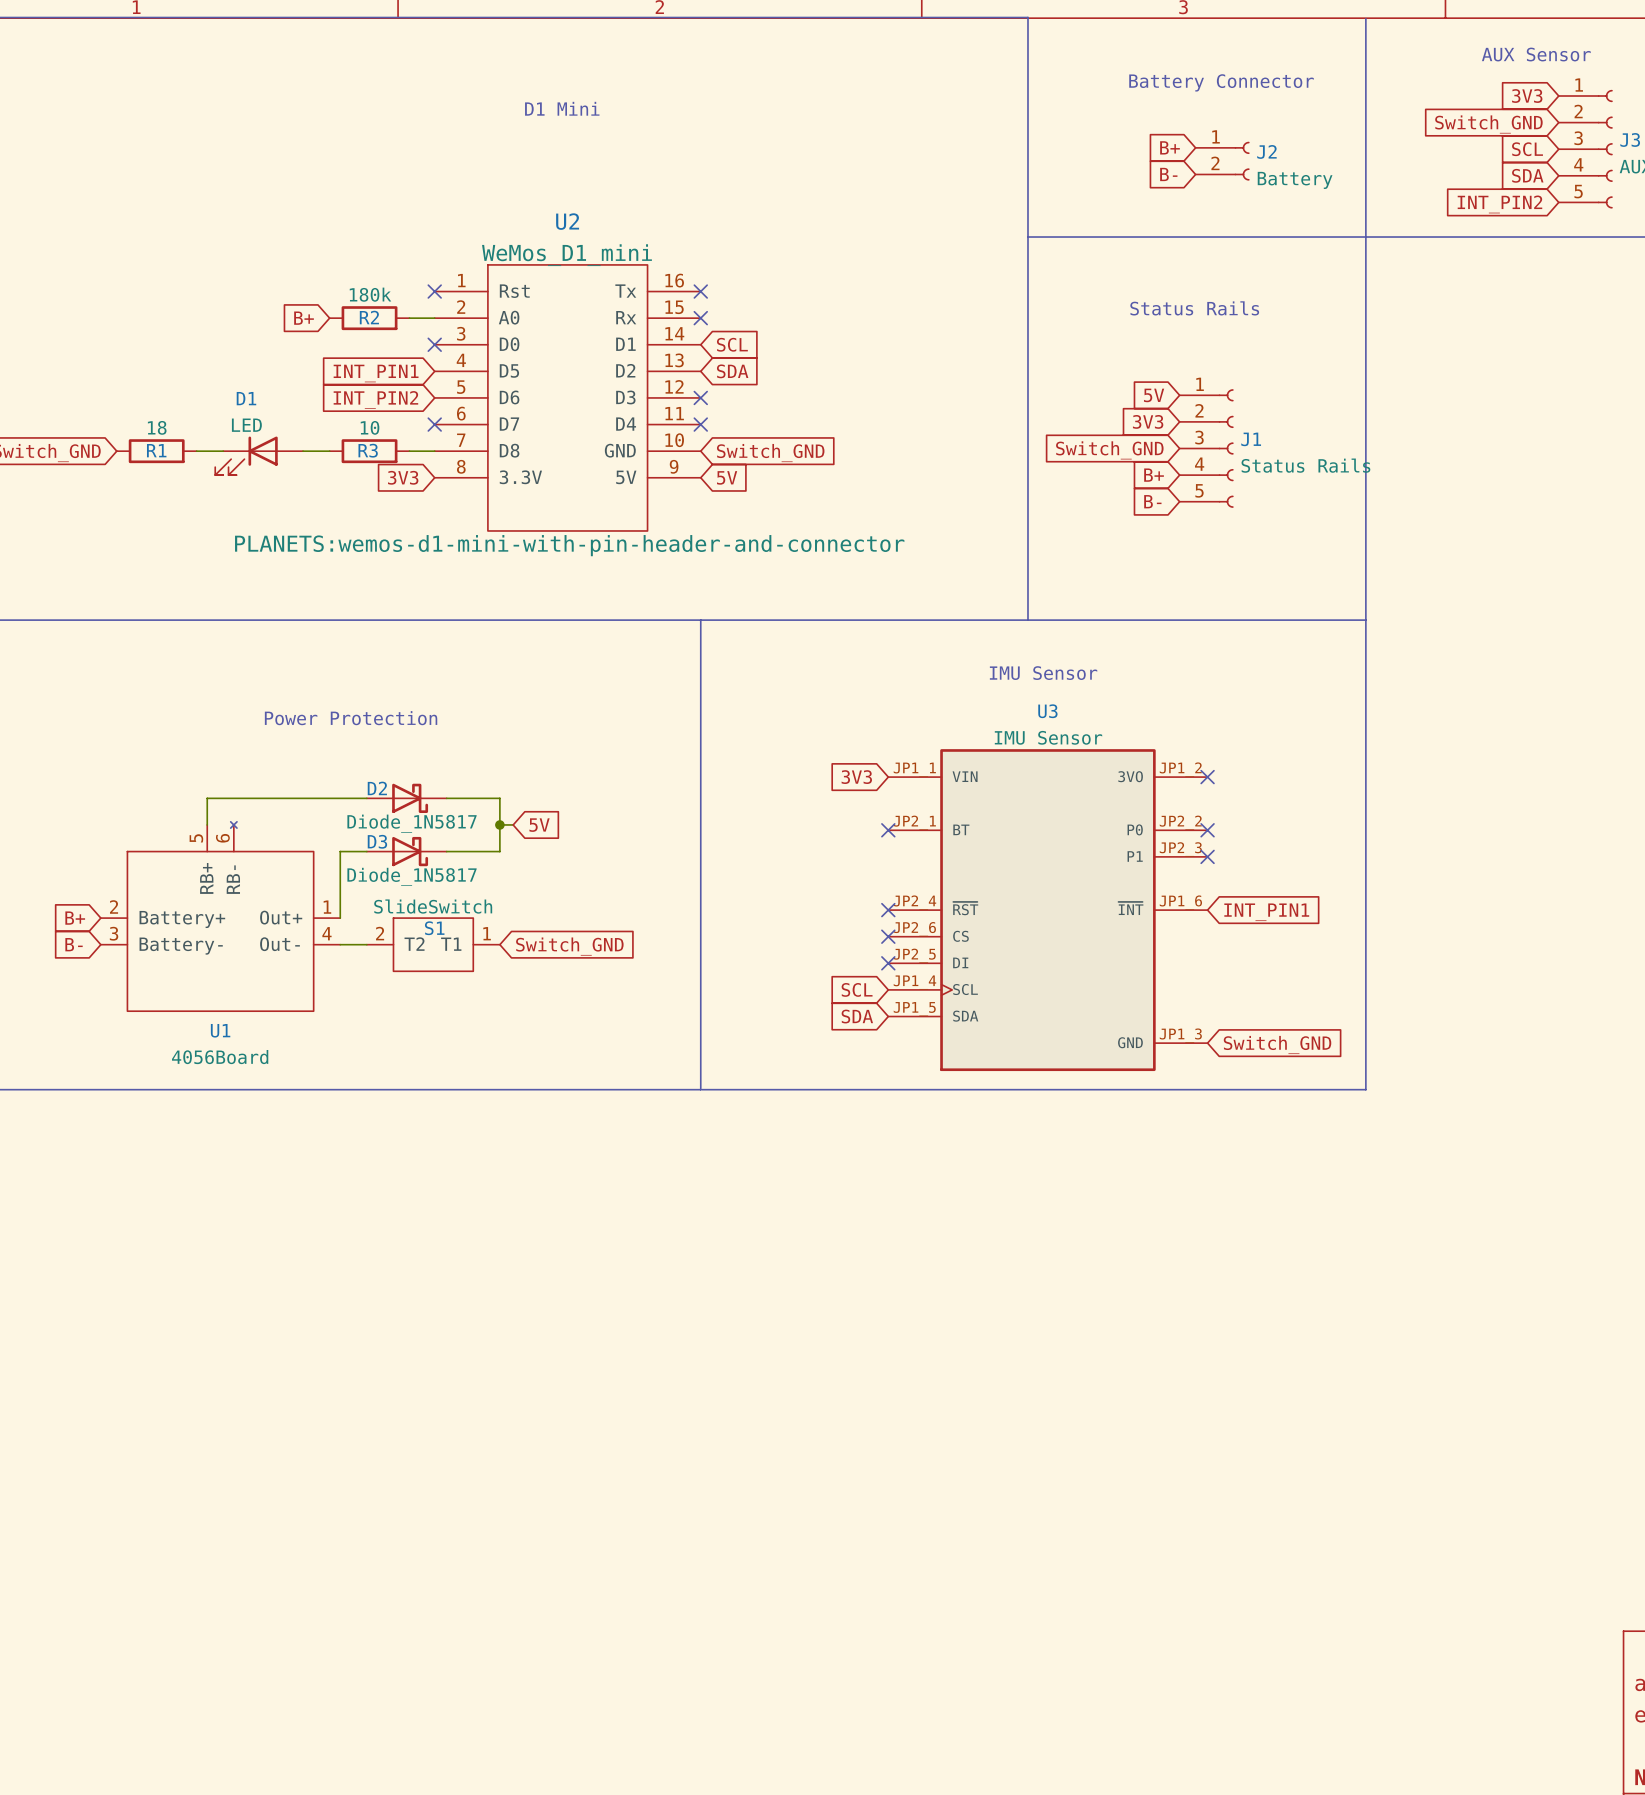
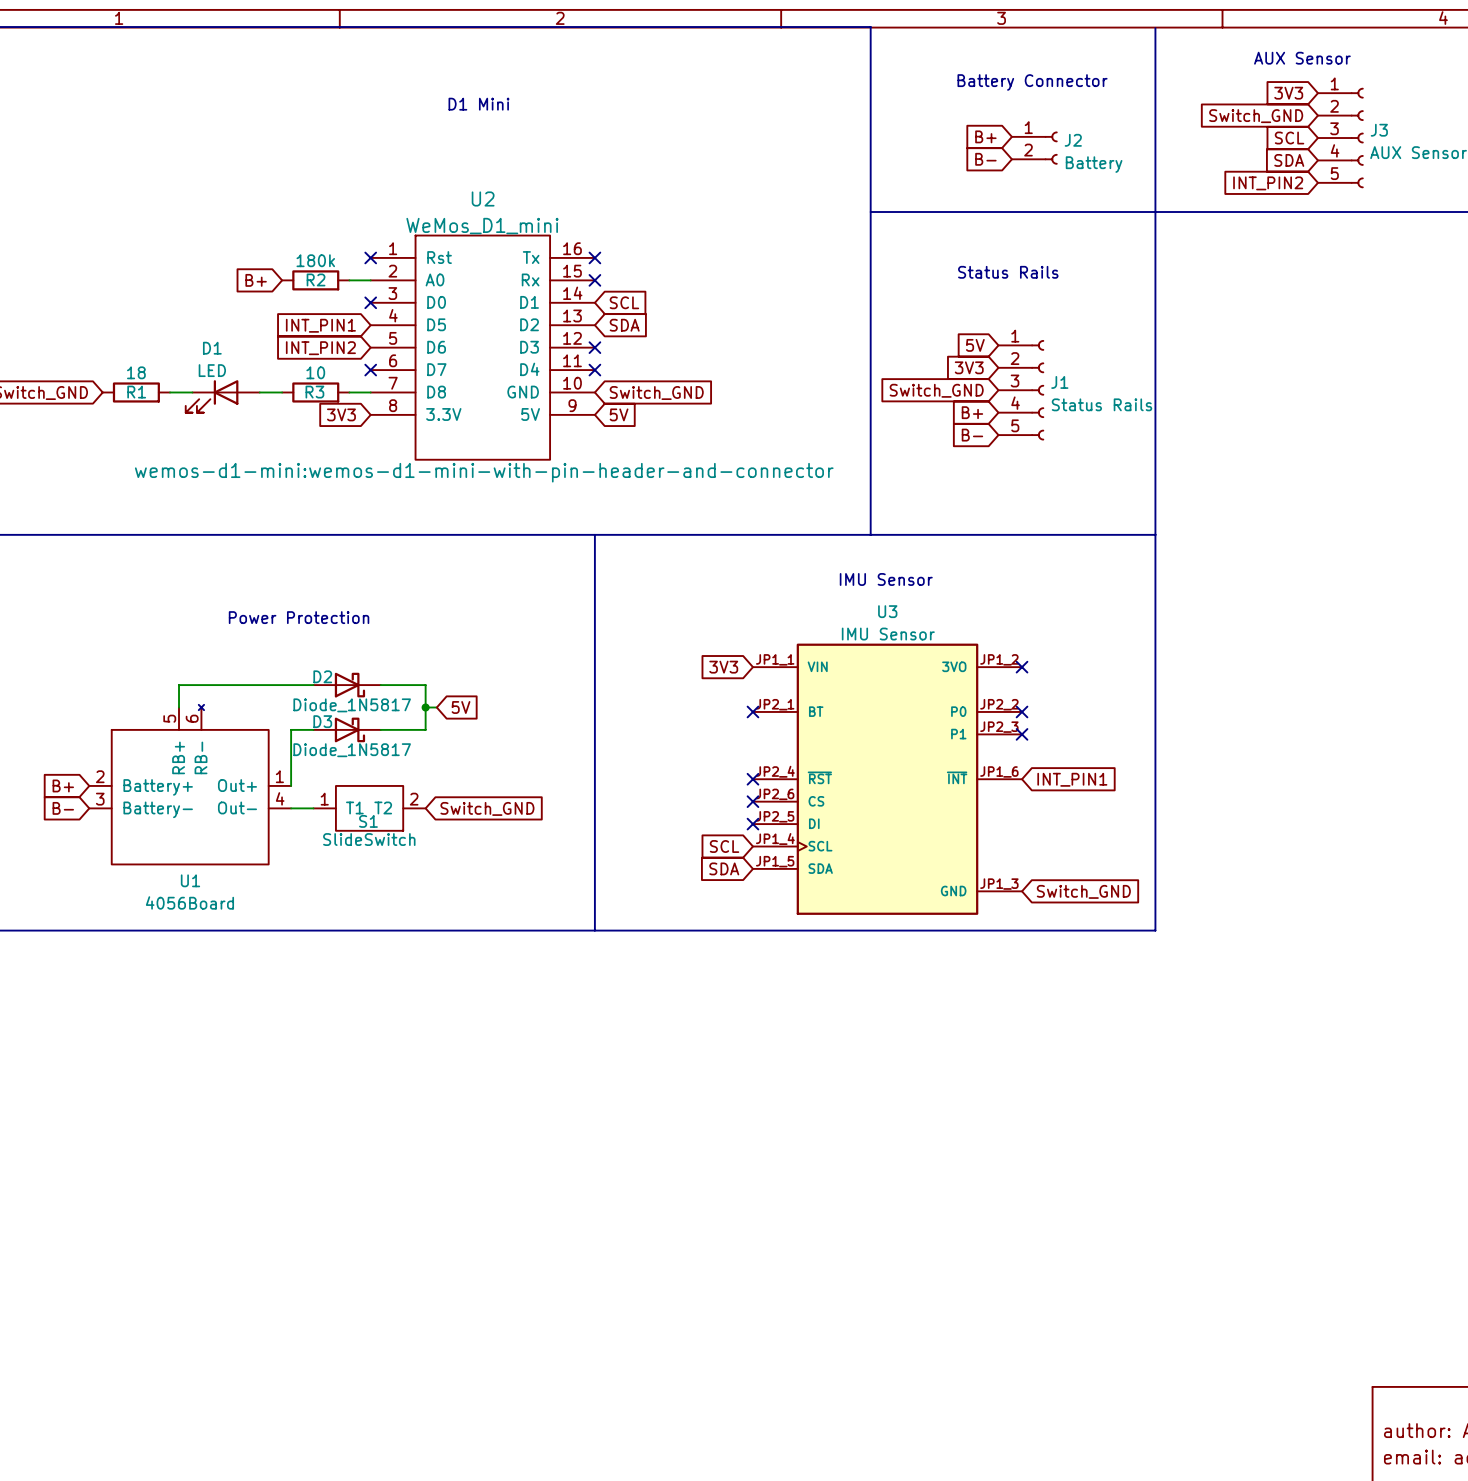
U2 text: PLANETS:wemos-d1-mini-with-pin-header-and-connector (569, 545) -> wemos-d1-mini:wemos-d1-mini-with-pin-header-and-connector (484, 472)
S1 rotation: 0° (433, 944) -> 180° (369, 808)

